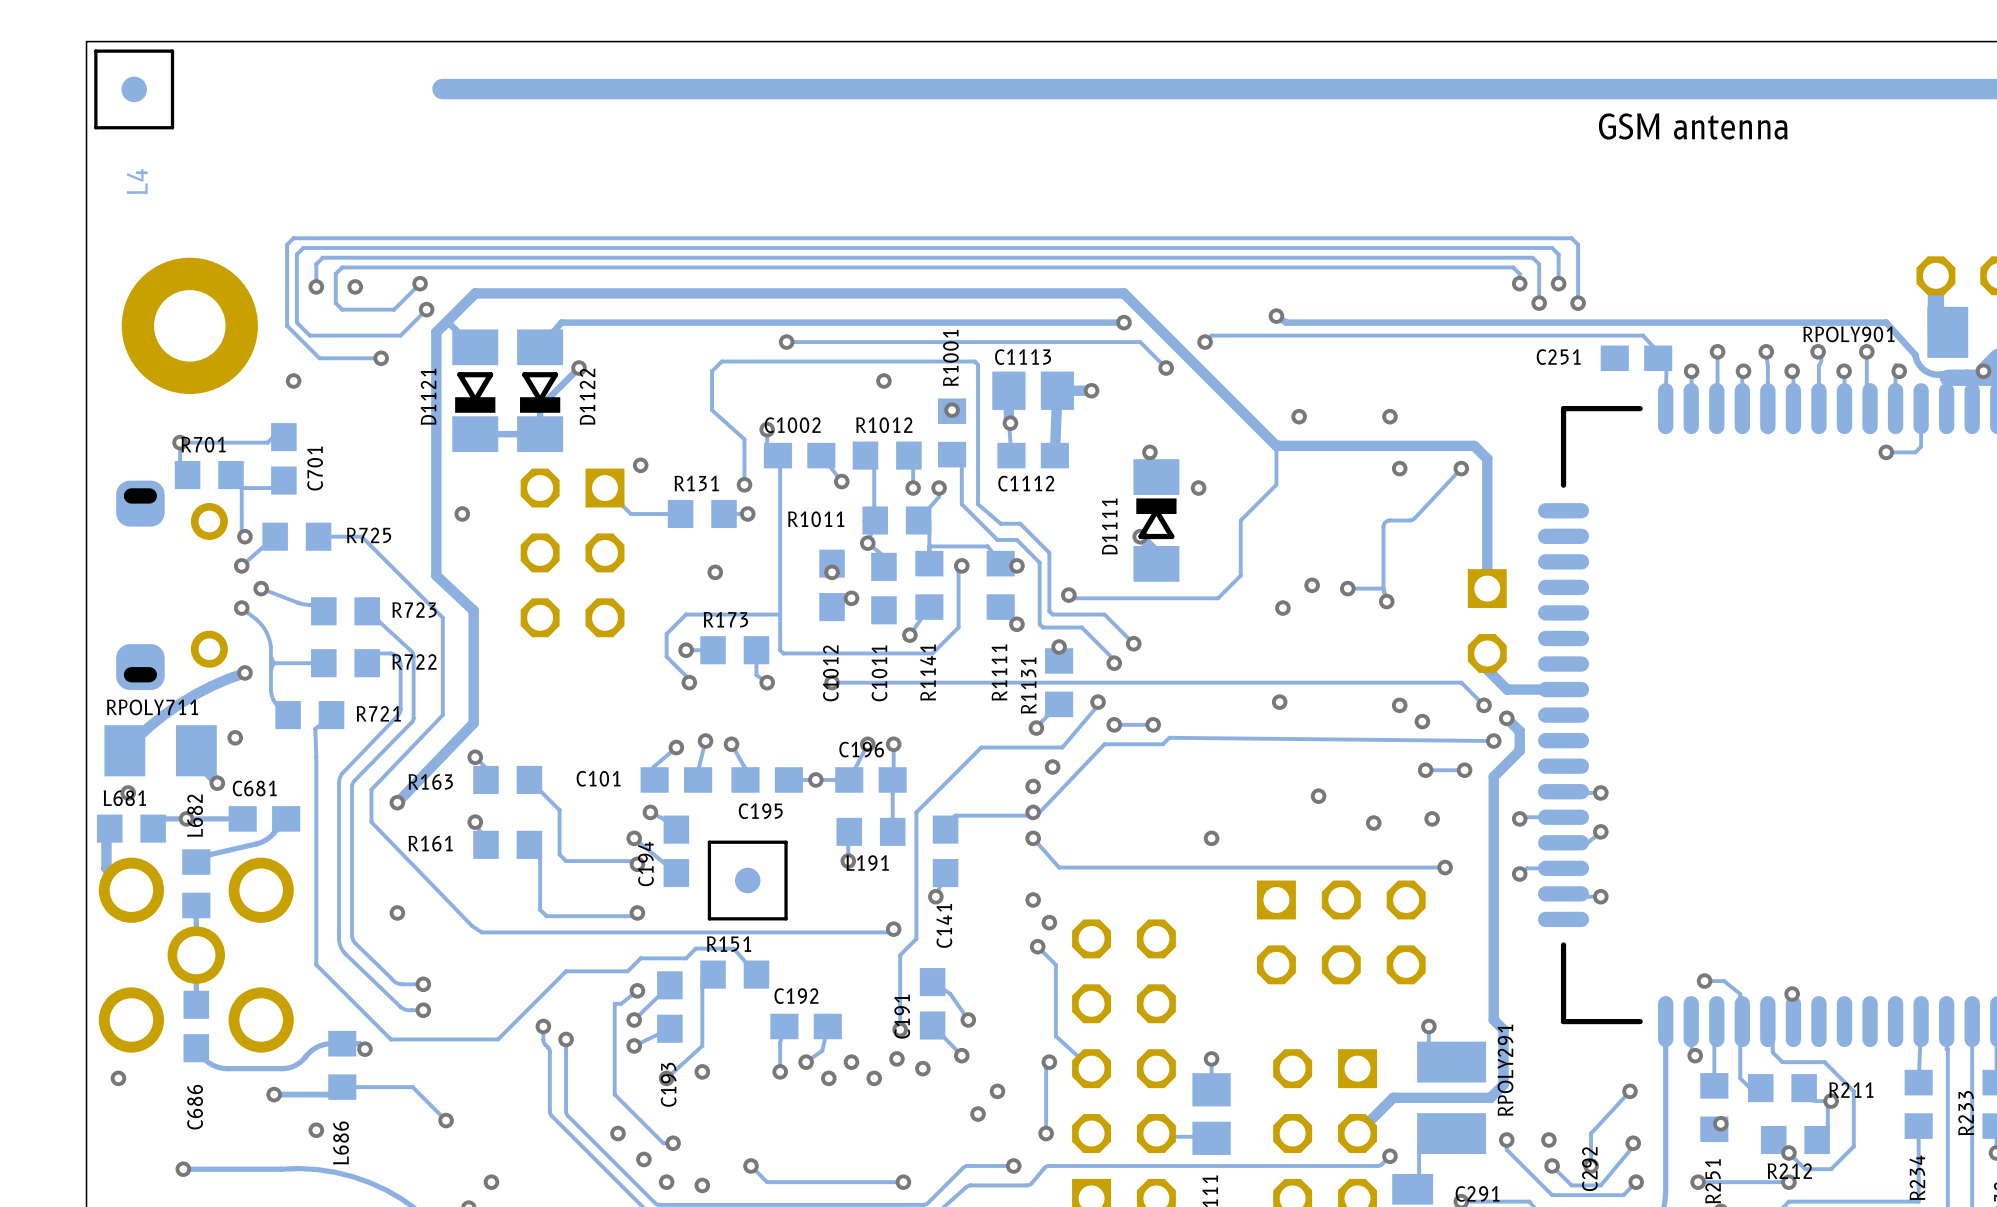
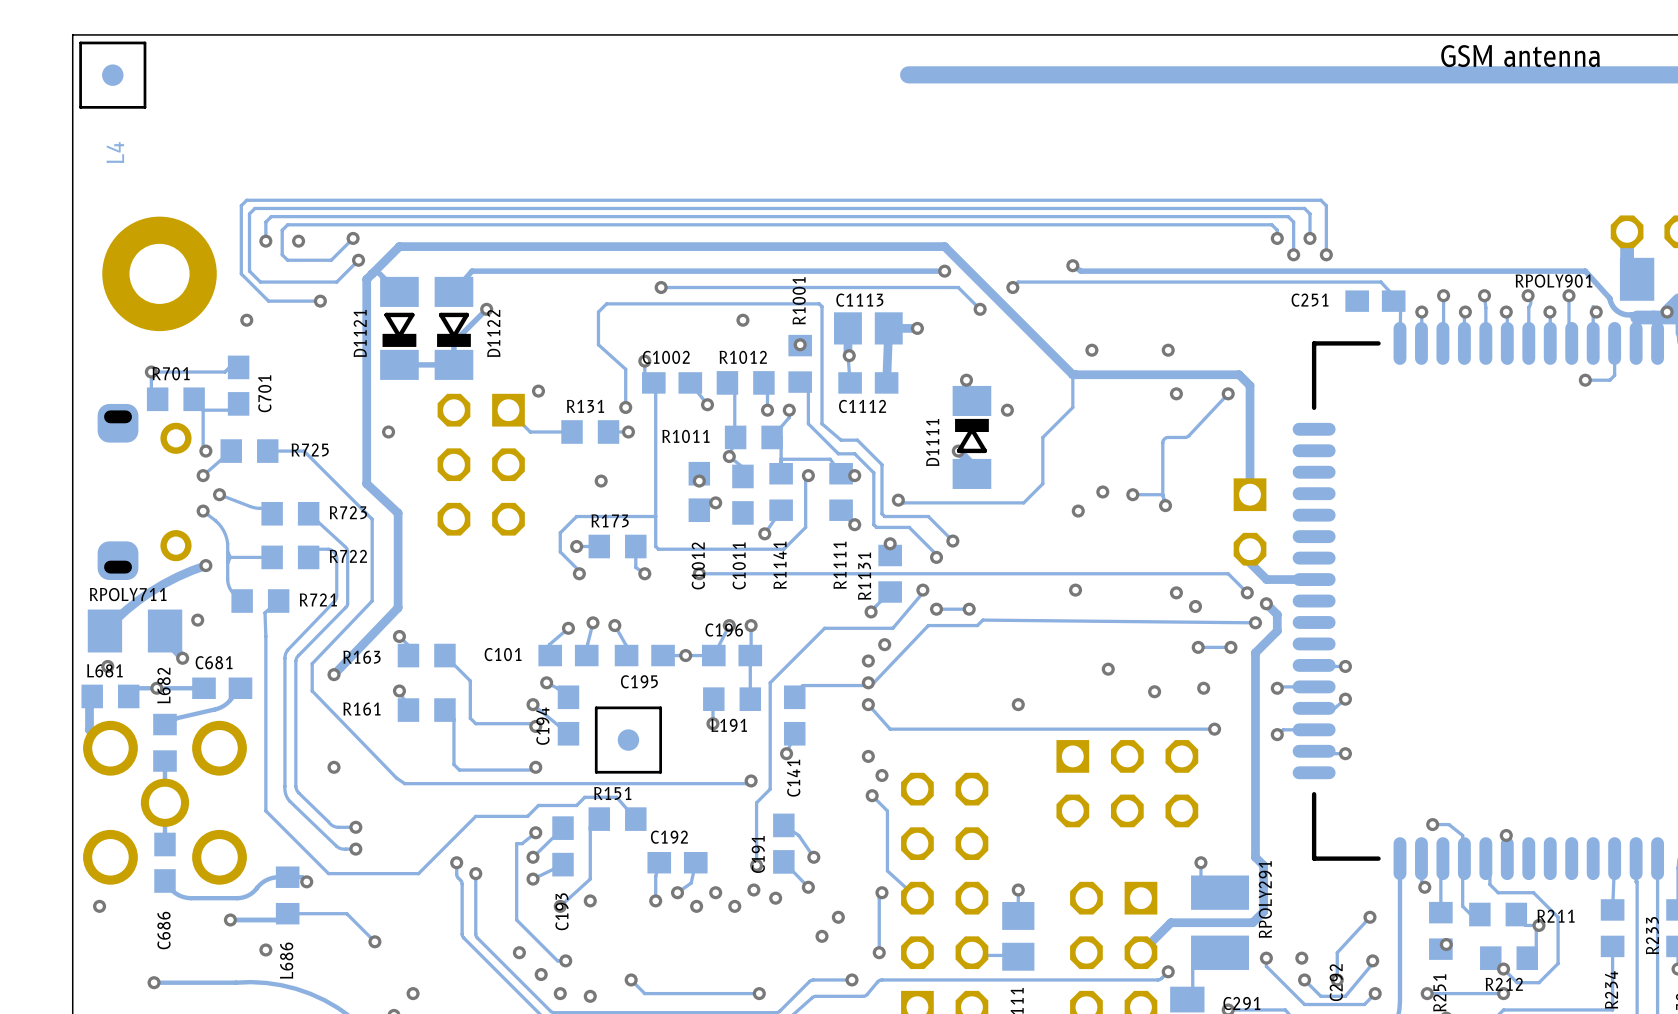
track: (1081, 89) (442, 89) -> none
text position: GSM antenna (1693, 126) -> GSM antenna (1520, 56)

